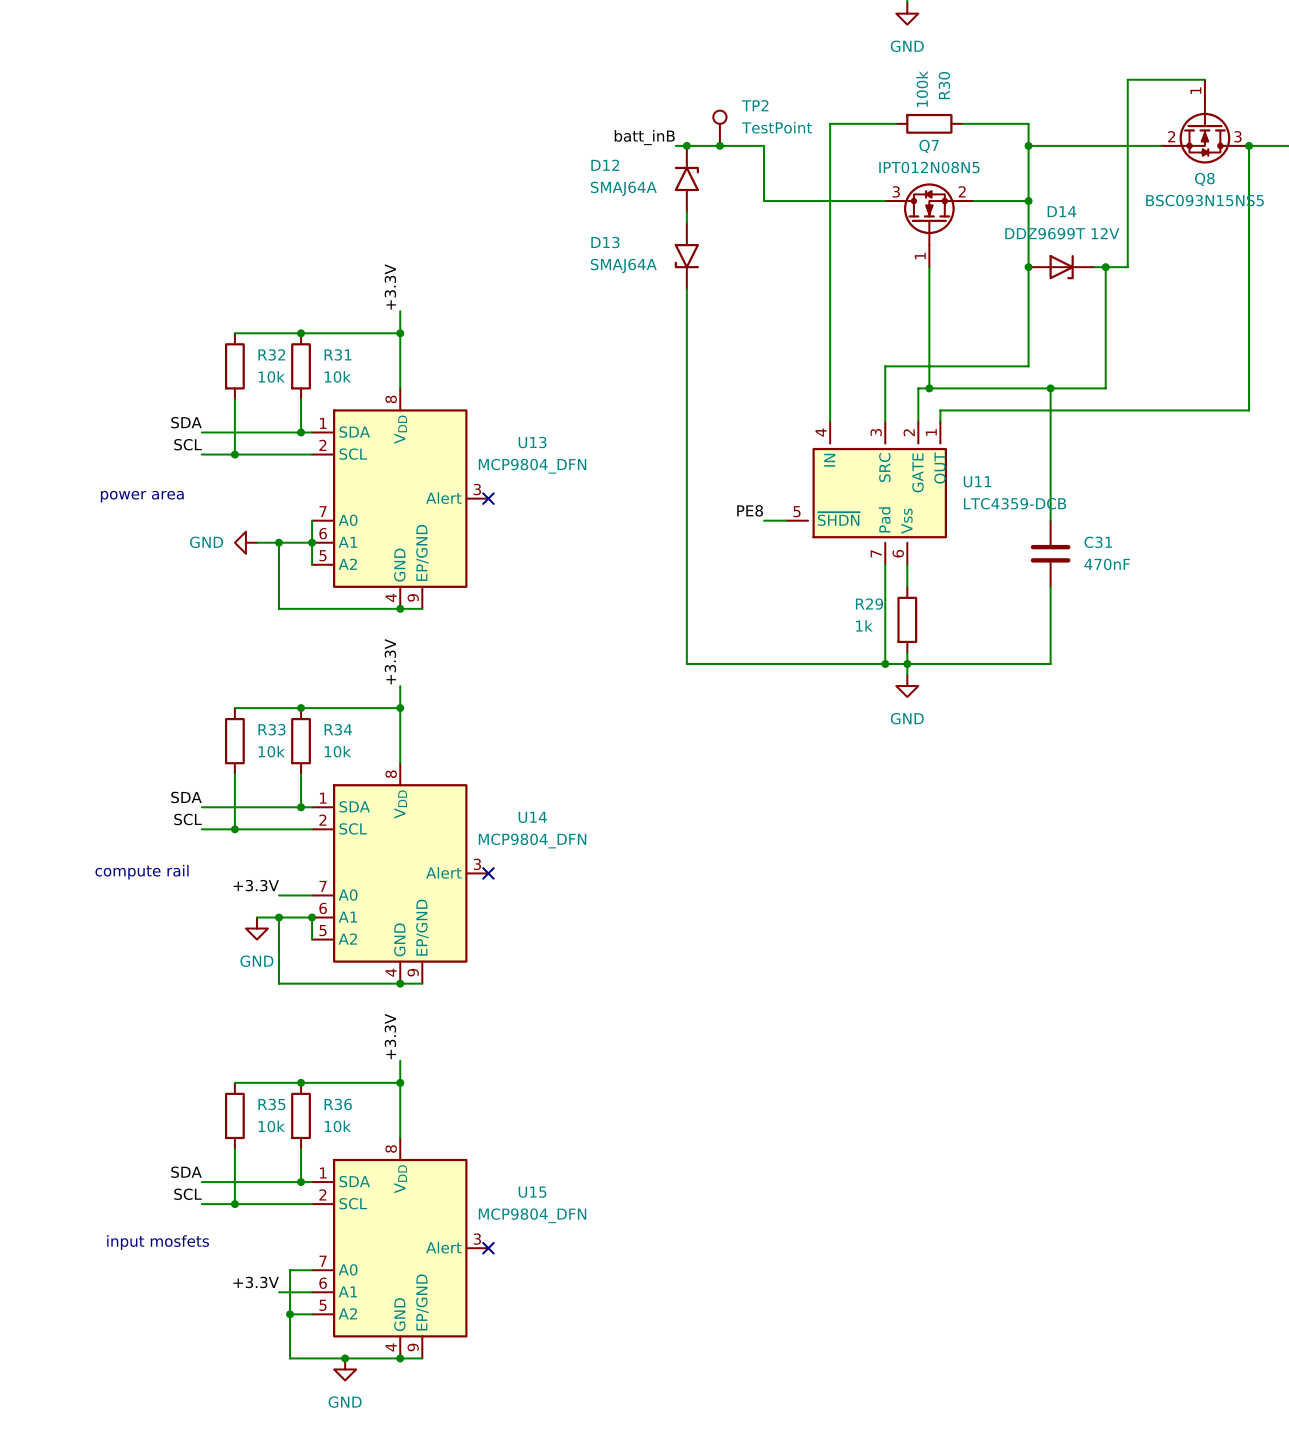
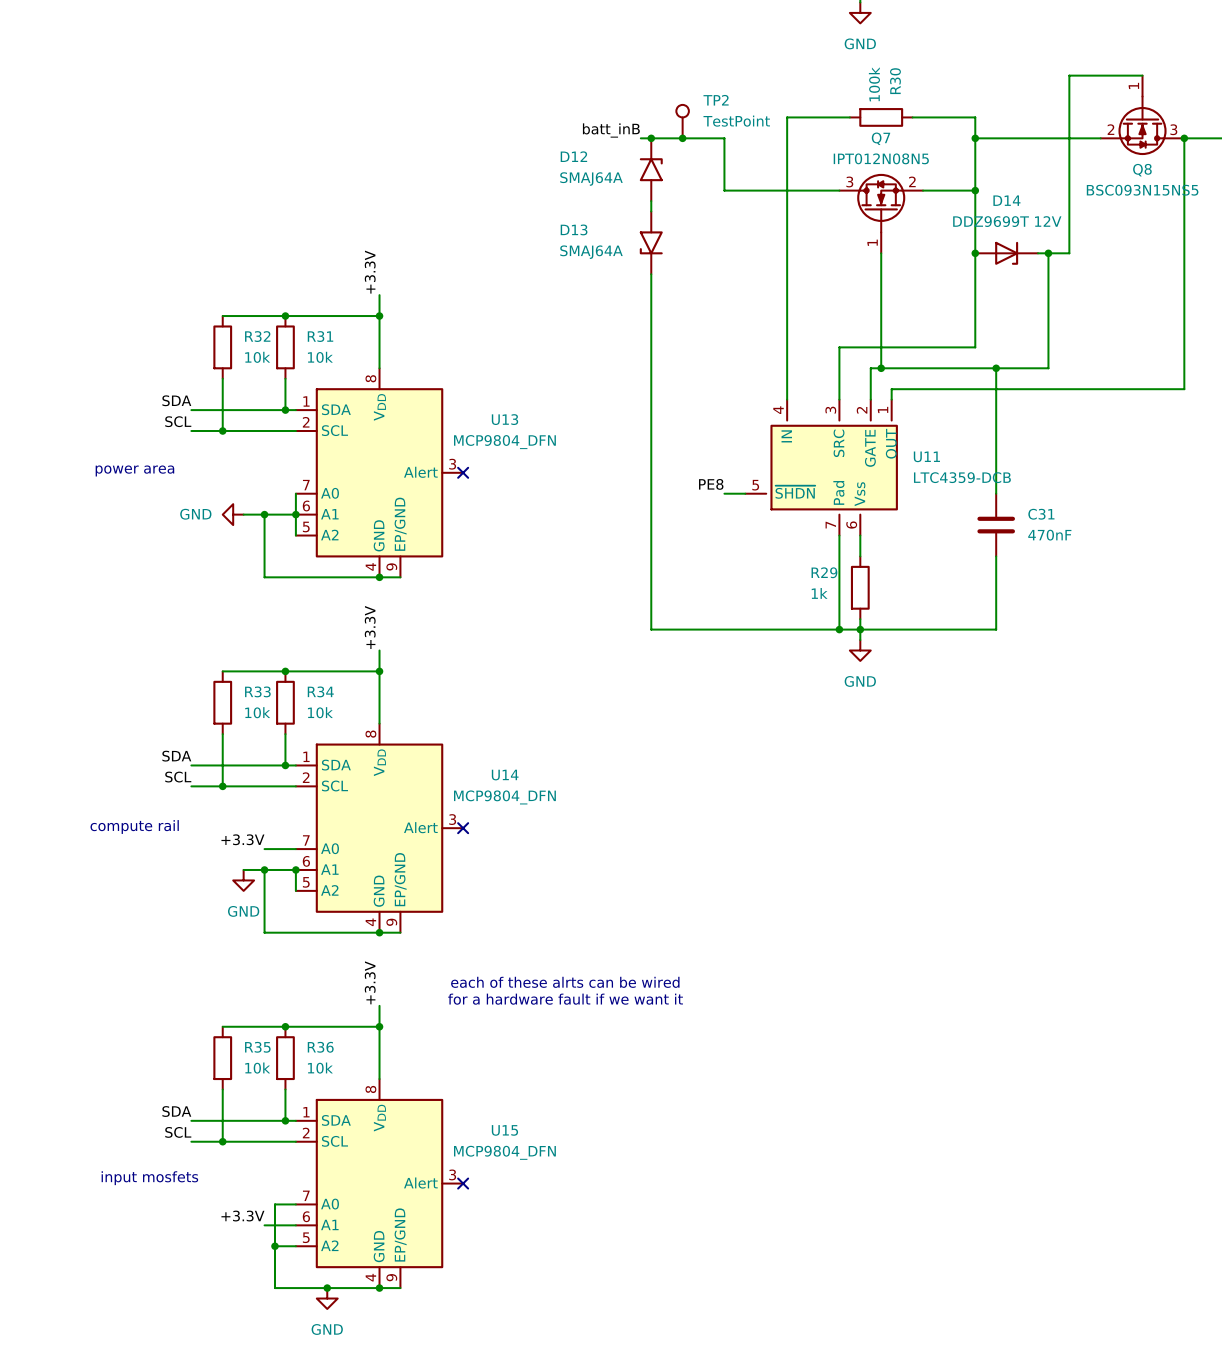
text: none -> each of these alrts can be wired (565, 982)
text: none -> for a hardware fault if we want it (565, 999)

